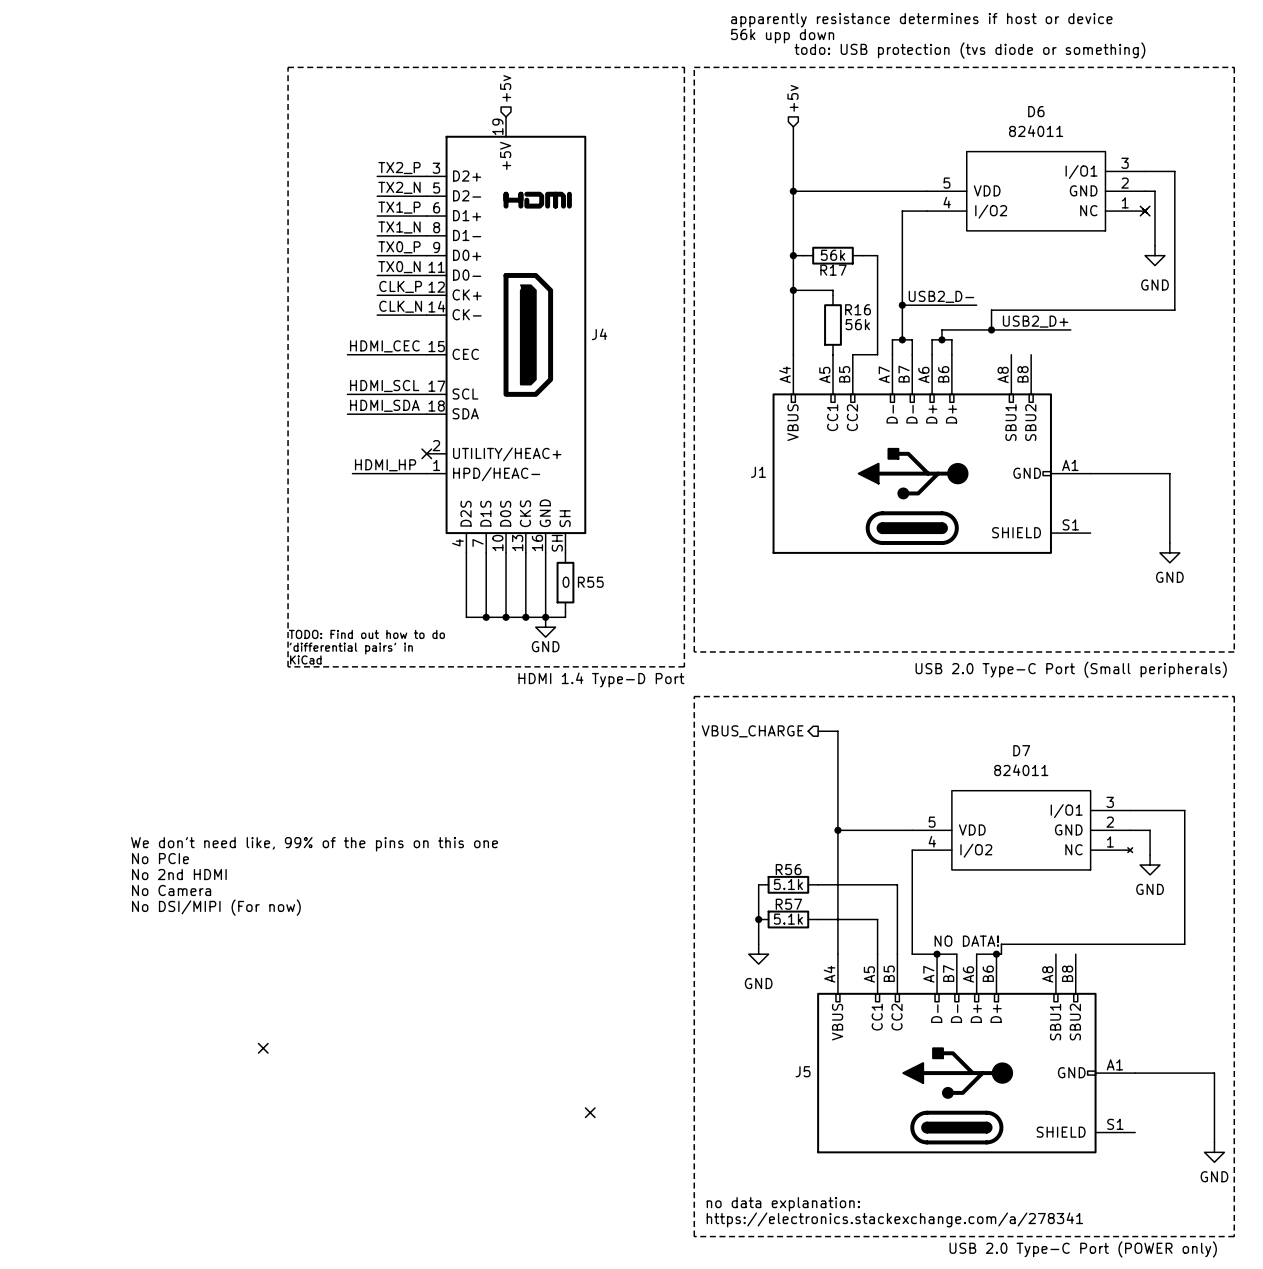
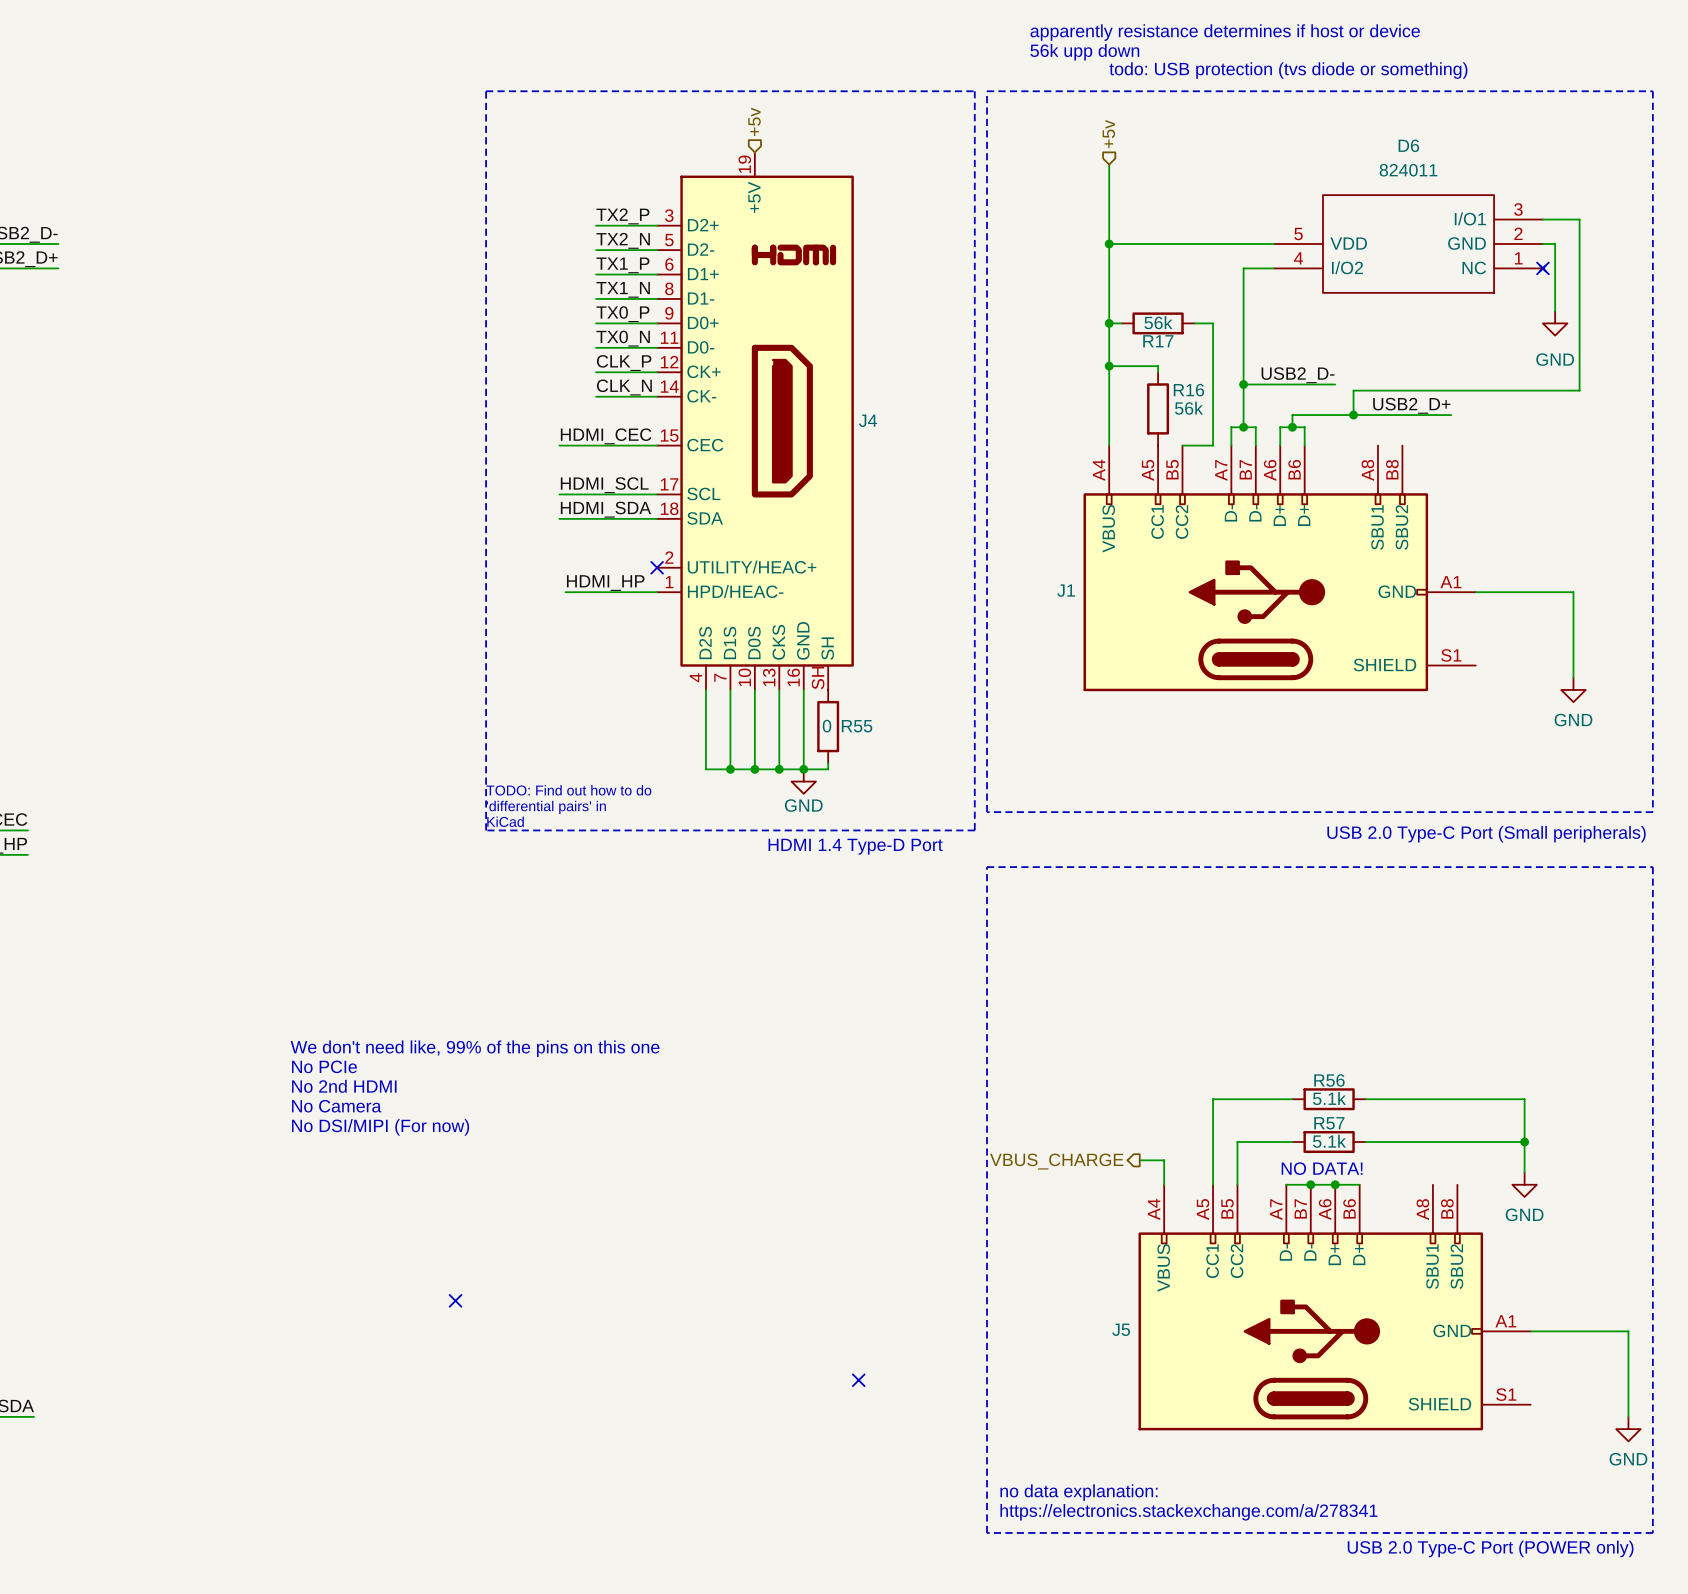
hierarchical label: VBUS_CHARGE (752, 731) -> none
wire: (818, 731) (837, 731) (837, 934) -> (1139, 1160) (1164, 1160)
wire: (1130, 810) (1184, 810) (1184, 944) (1001, 944) (1001, 954) (996, 954) -> none
wire: (837, 830) (912, 830) -> none
junction: (837, 830) -> none
D7: 824011 (1022, 830) -> none
wire: (1130, 830) (1150, 830) (1150, 855) -> none
wire: (912, 850) (912, 954) (937, 954) -> none
power symbol position: GND (1150, 865) -> GND (1524, 1184)
wire: (758, 884) (758, 944) -> none
R56 position: (788, 884) -> (1329, 1099)
wire: (818, 884) (877, 884) -> (1213, 1142) (1213, 1099)
wire: (897, 884) (897, 919) -> (1237, 1099) (1292, 1099)
wire: none -> (1365, 1099) (1524, 1099) (1524, 1172)
junction: (758, 919) -> none
R57 position: (788, 919) -> (1329, 1142)
wire: (818, 919) (877, 919) -> none
wire: none -> (1237, 1142) (1292, 1142)
wire: none -> (1365, 1142) (1524, 1142)
junction: none -> (1524, 1142)
hierarchical label: none -> VBUS_CHARGE (1056, 1161)
power symbol: GND (758, 954) -> none
junction: (937, 954) -> none
wire: none -> (1310, 1184) (1335, 1184)
junction: none -> (1310, 1184)
junction: none -> (1335, 1184)
junction: (996, 954) -> none

